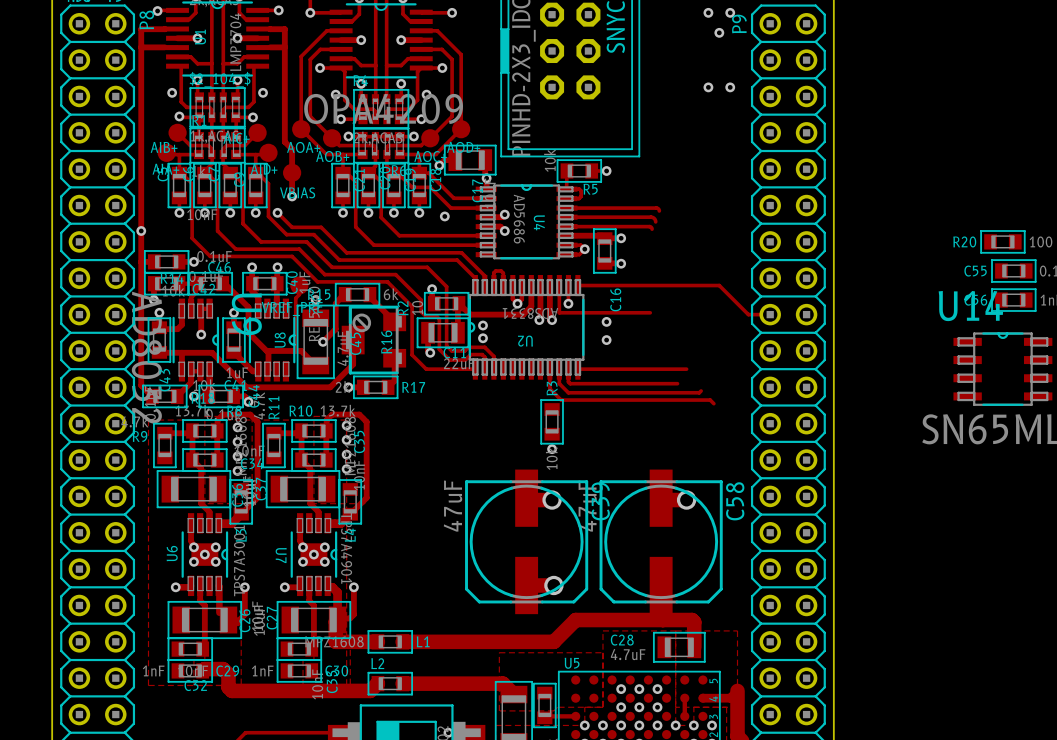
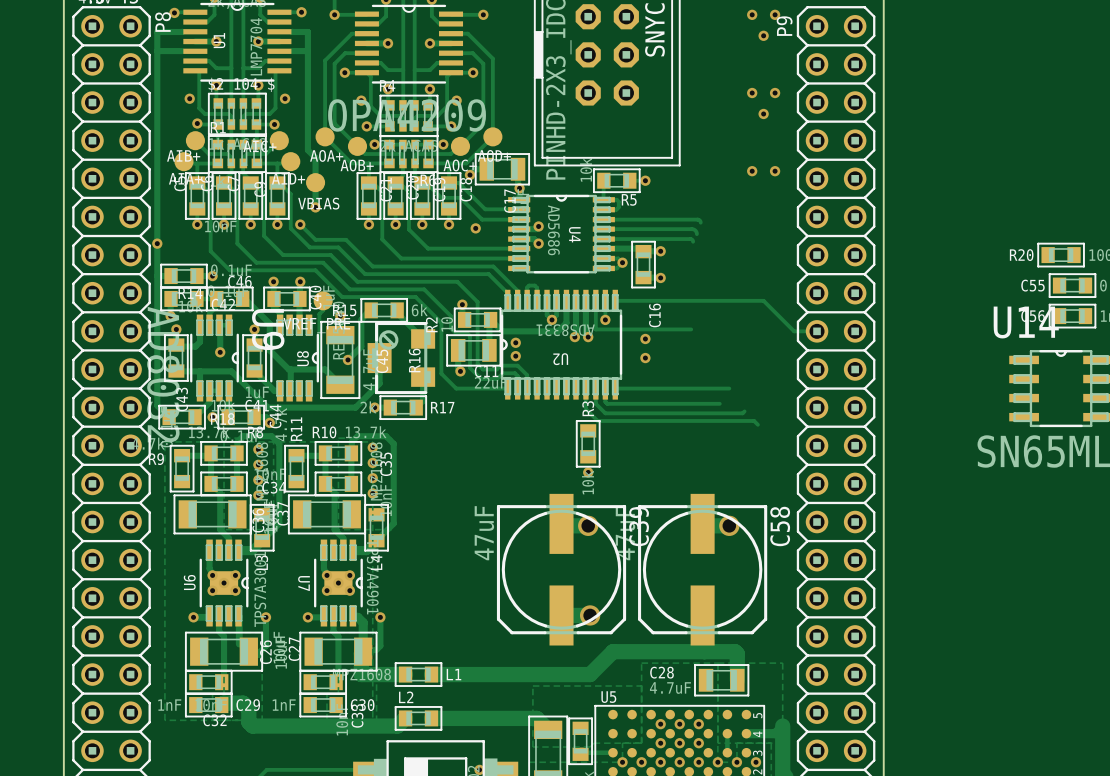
via: none -> (763, 113)
via: none -> (752, 171)
via: none -> (775, 171)

